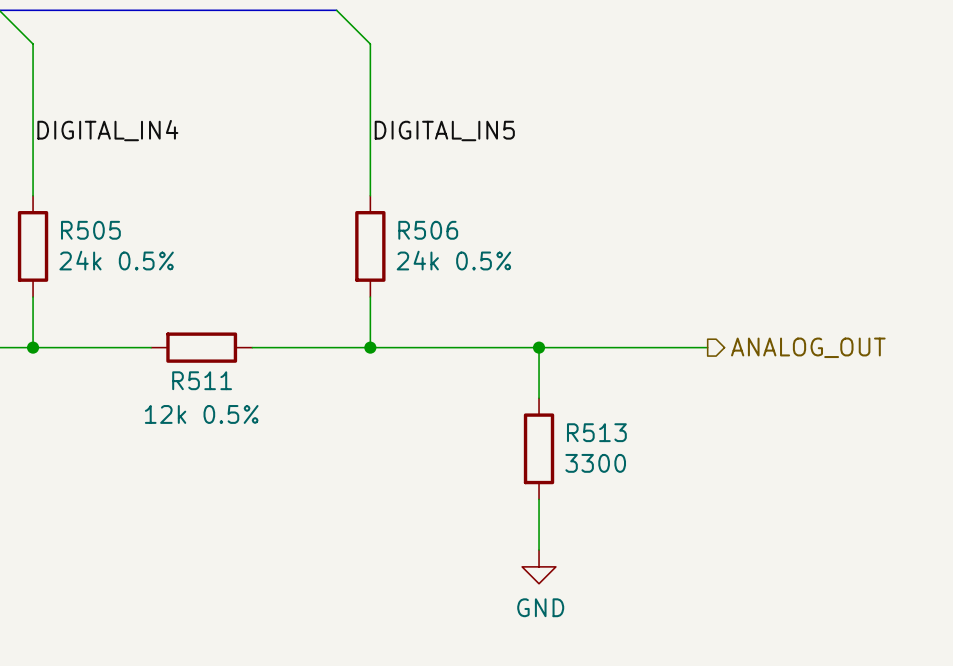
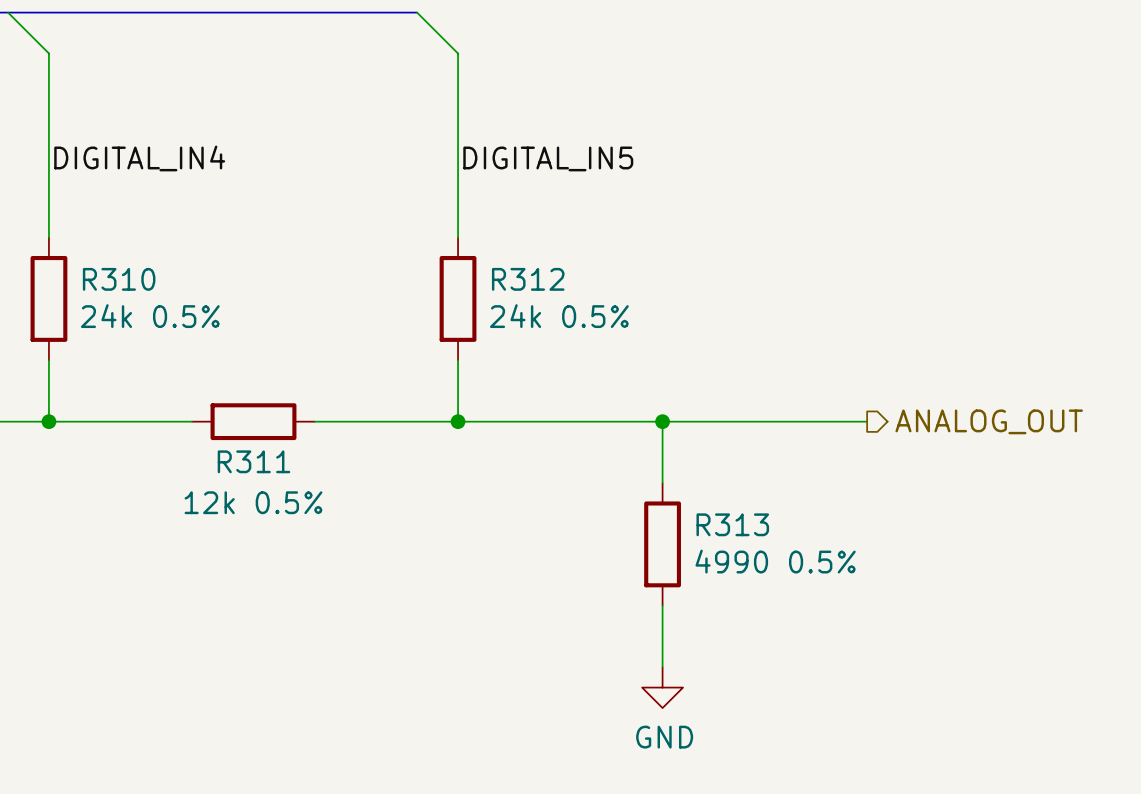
R505 name: R505 (90, 230) -> R310 (119, 279)
R506 name: R506 (428, 230) -> R312 (528, 279)
R511 name: R511 (202, 380) -> R311 (253, 461)
R513 name: R513 (596, 432) -> R313 (732, 524)
R513 value: 3300 (595, 463) -> 4990 0.5% (775, 561)

